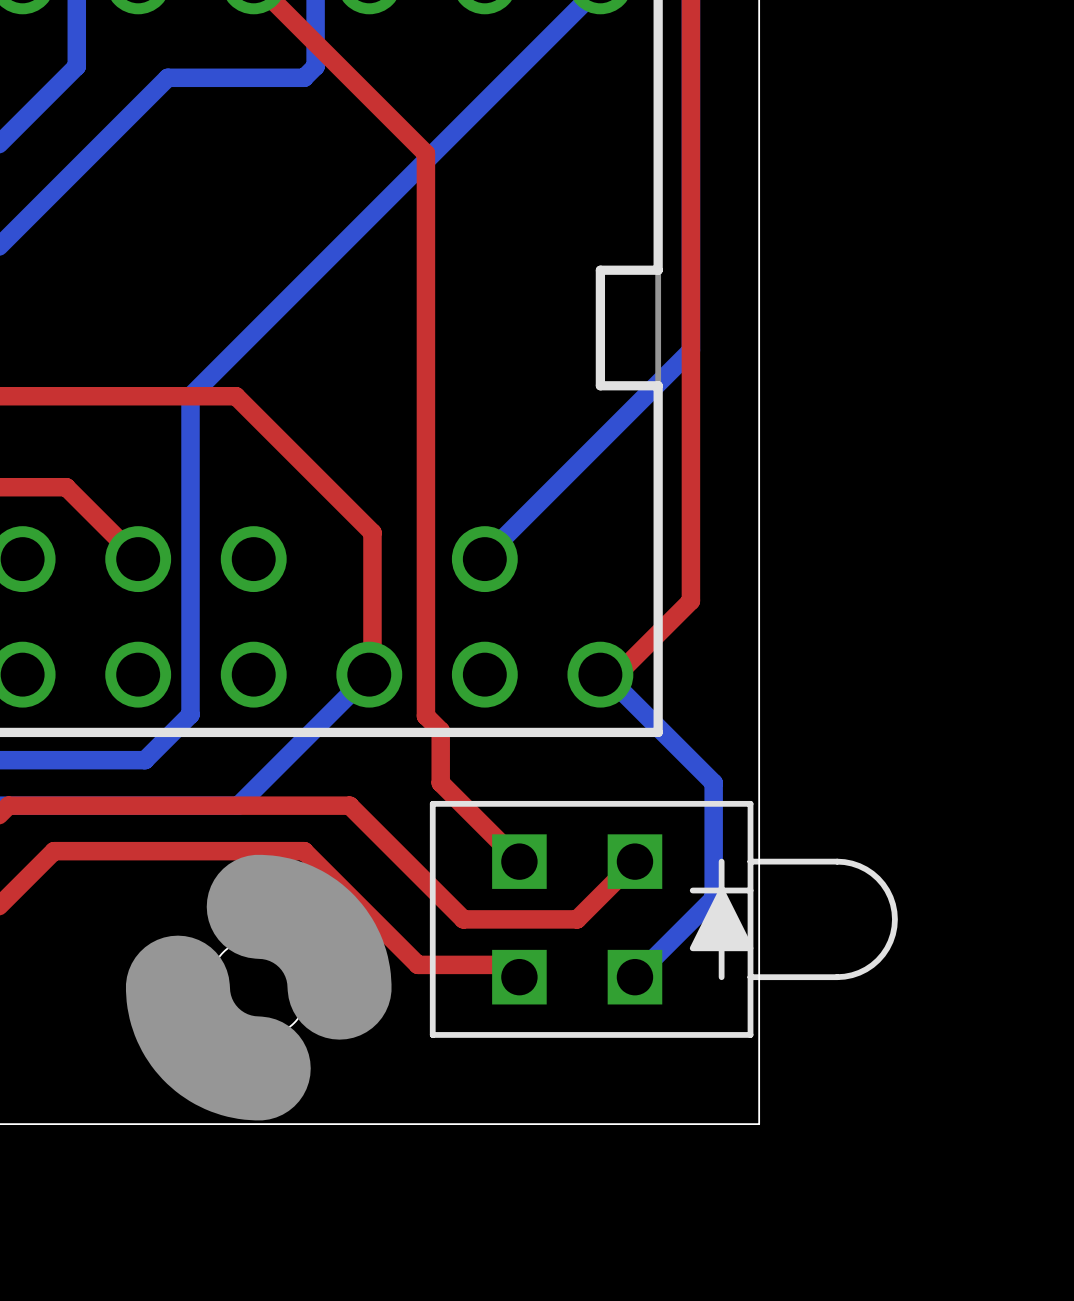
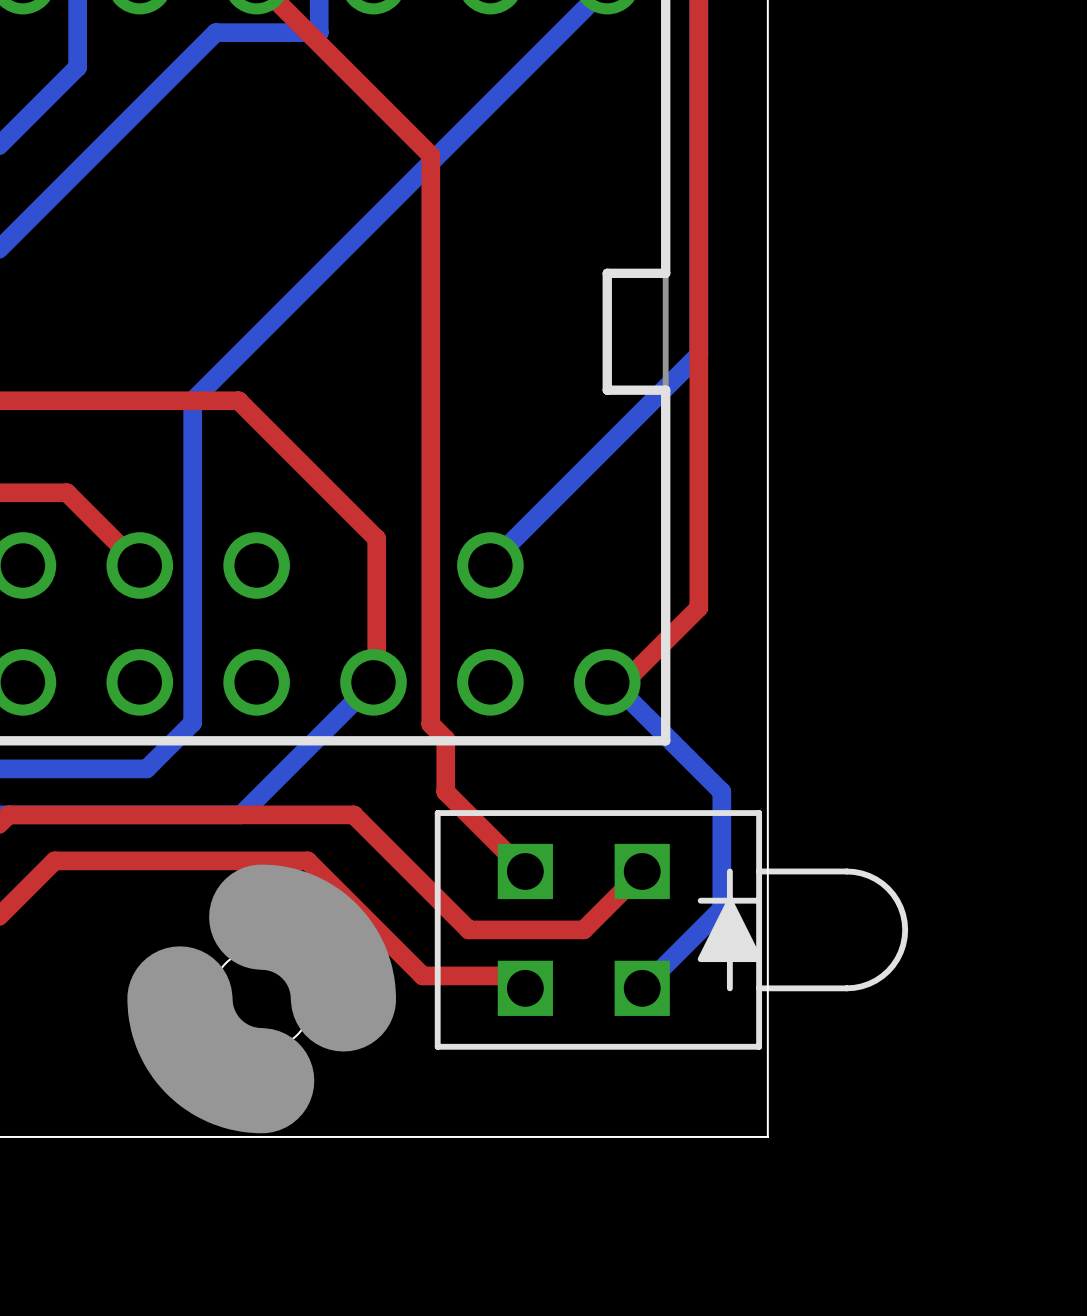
bottom track: (315, 32) (315, 66) (304, 77) (167, 77) -> (319, 32) (215, 32) (169, 78)

